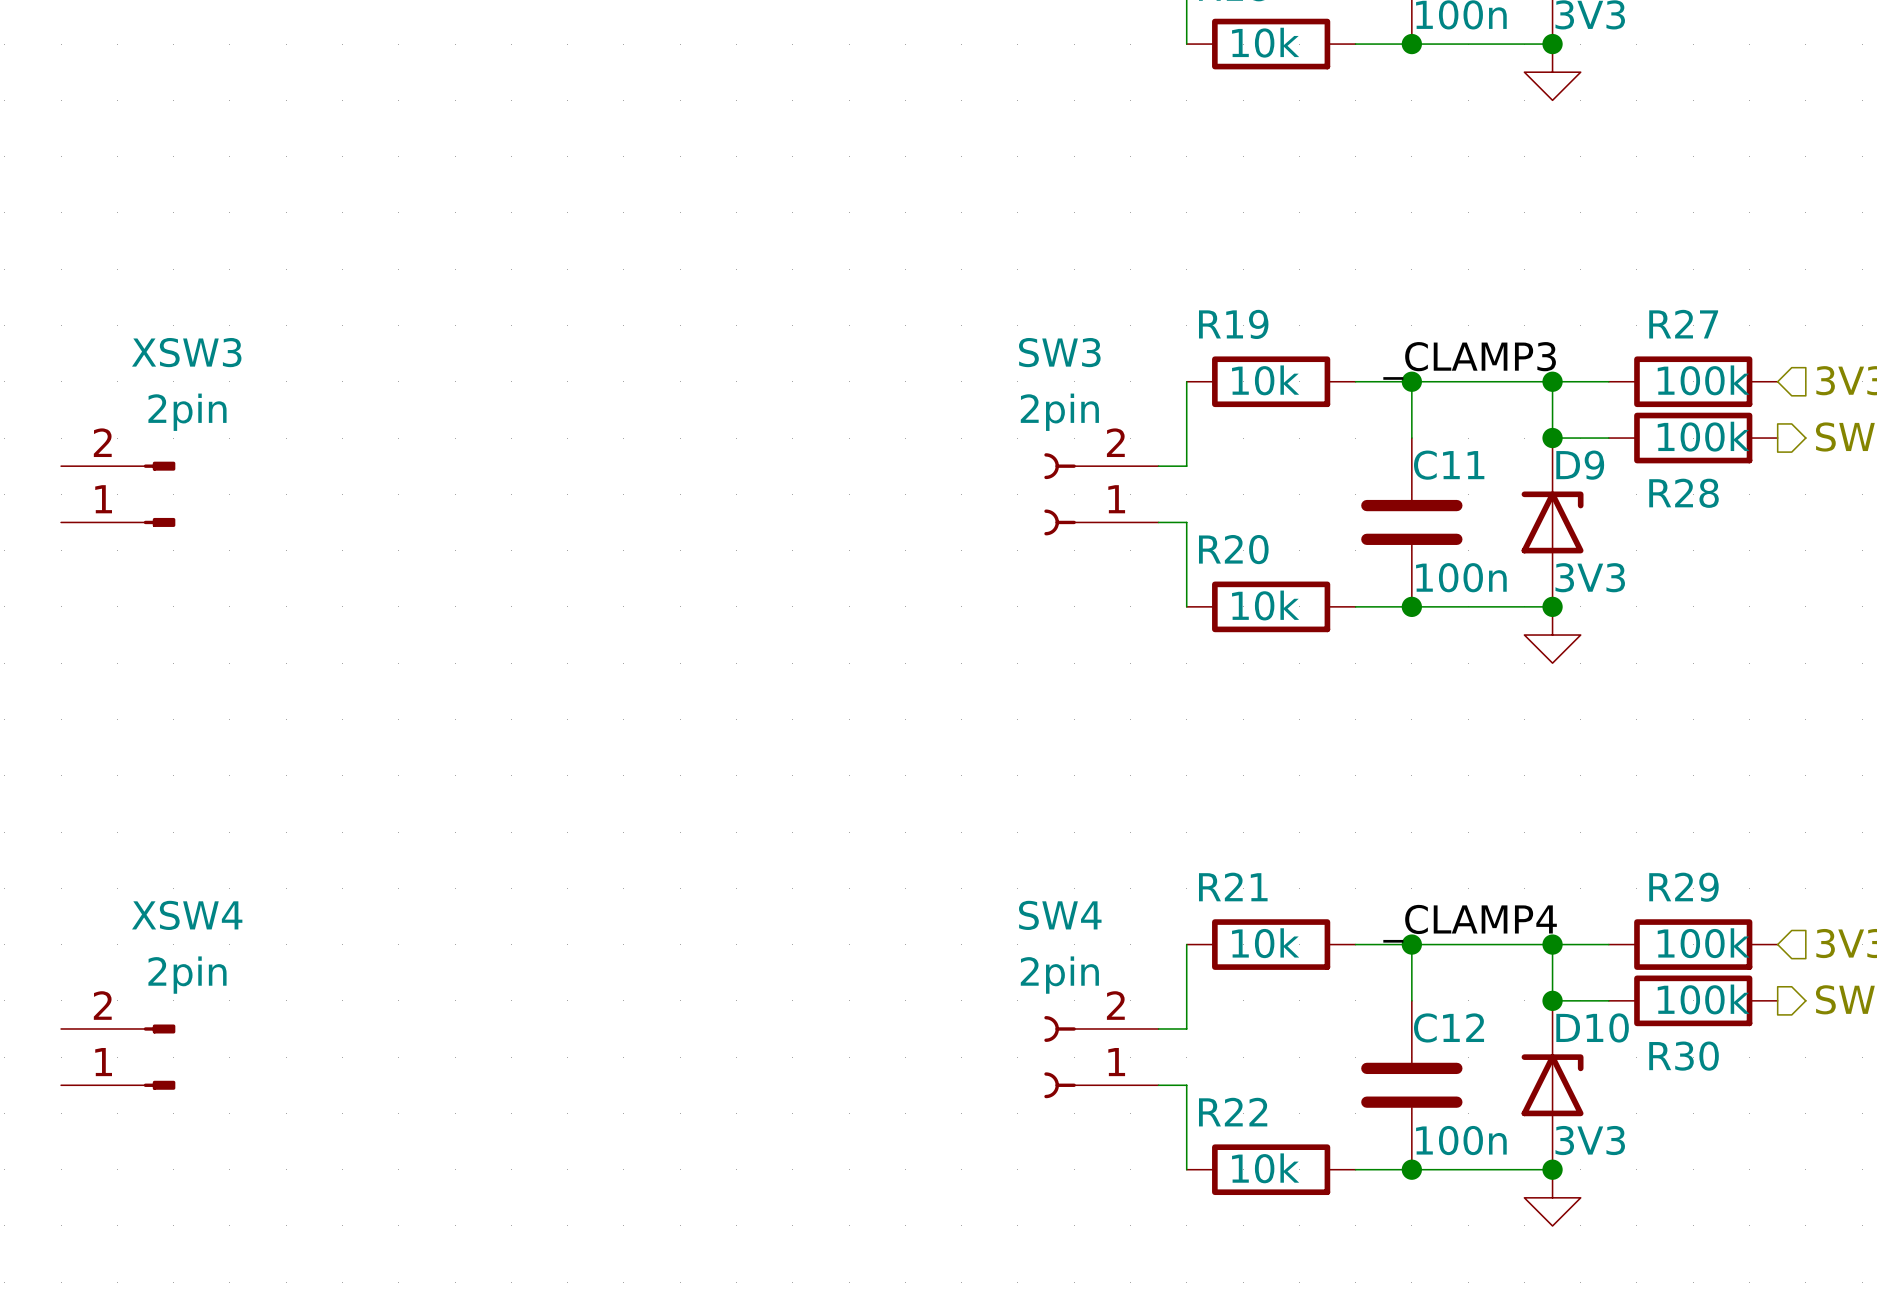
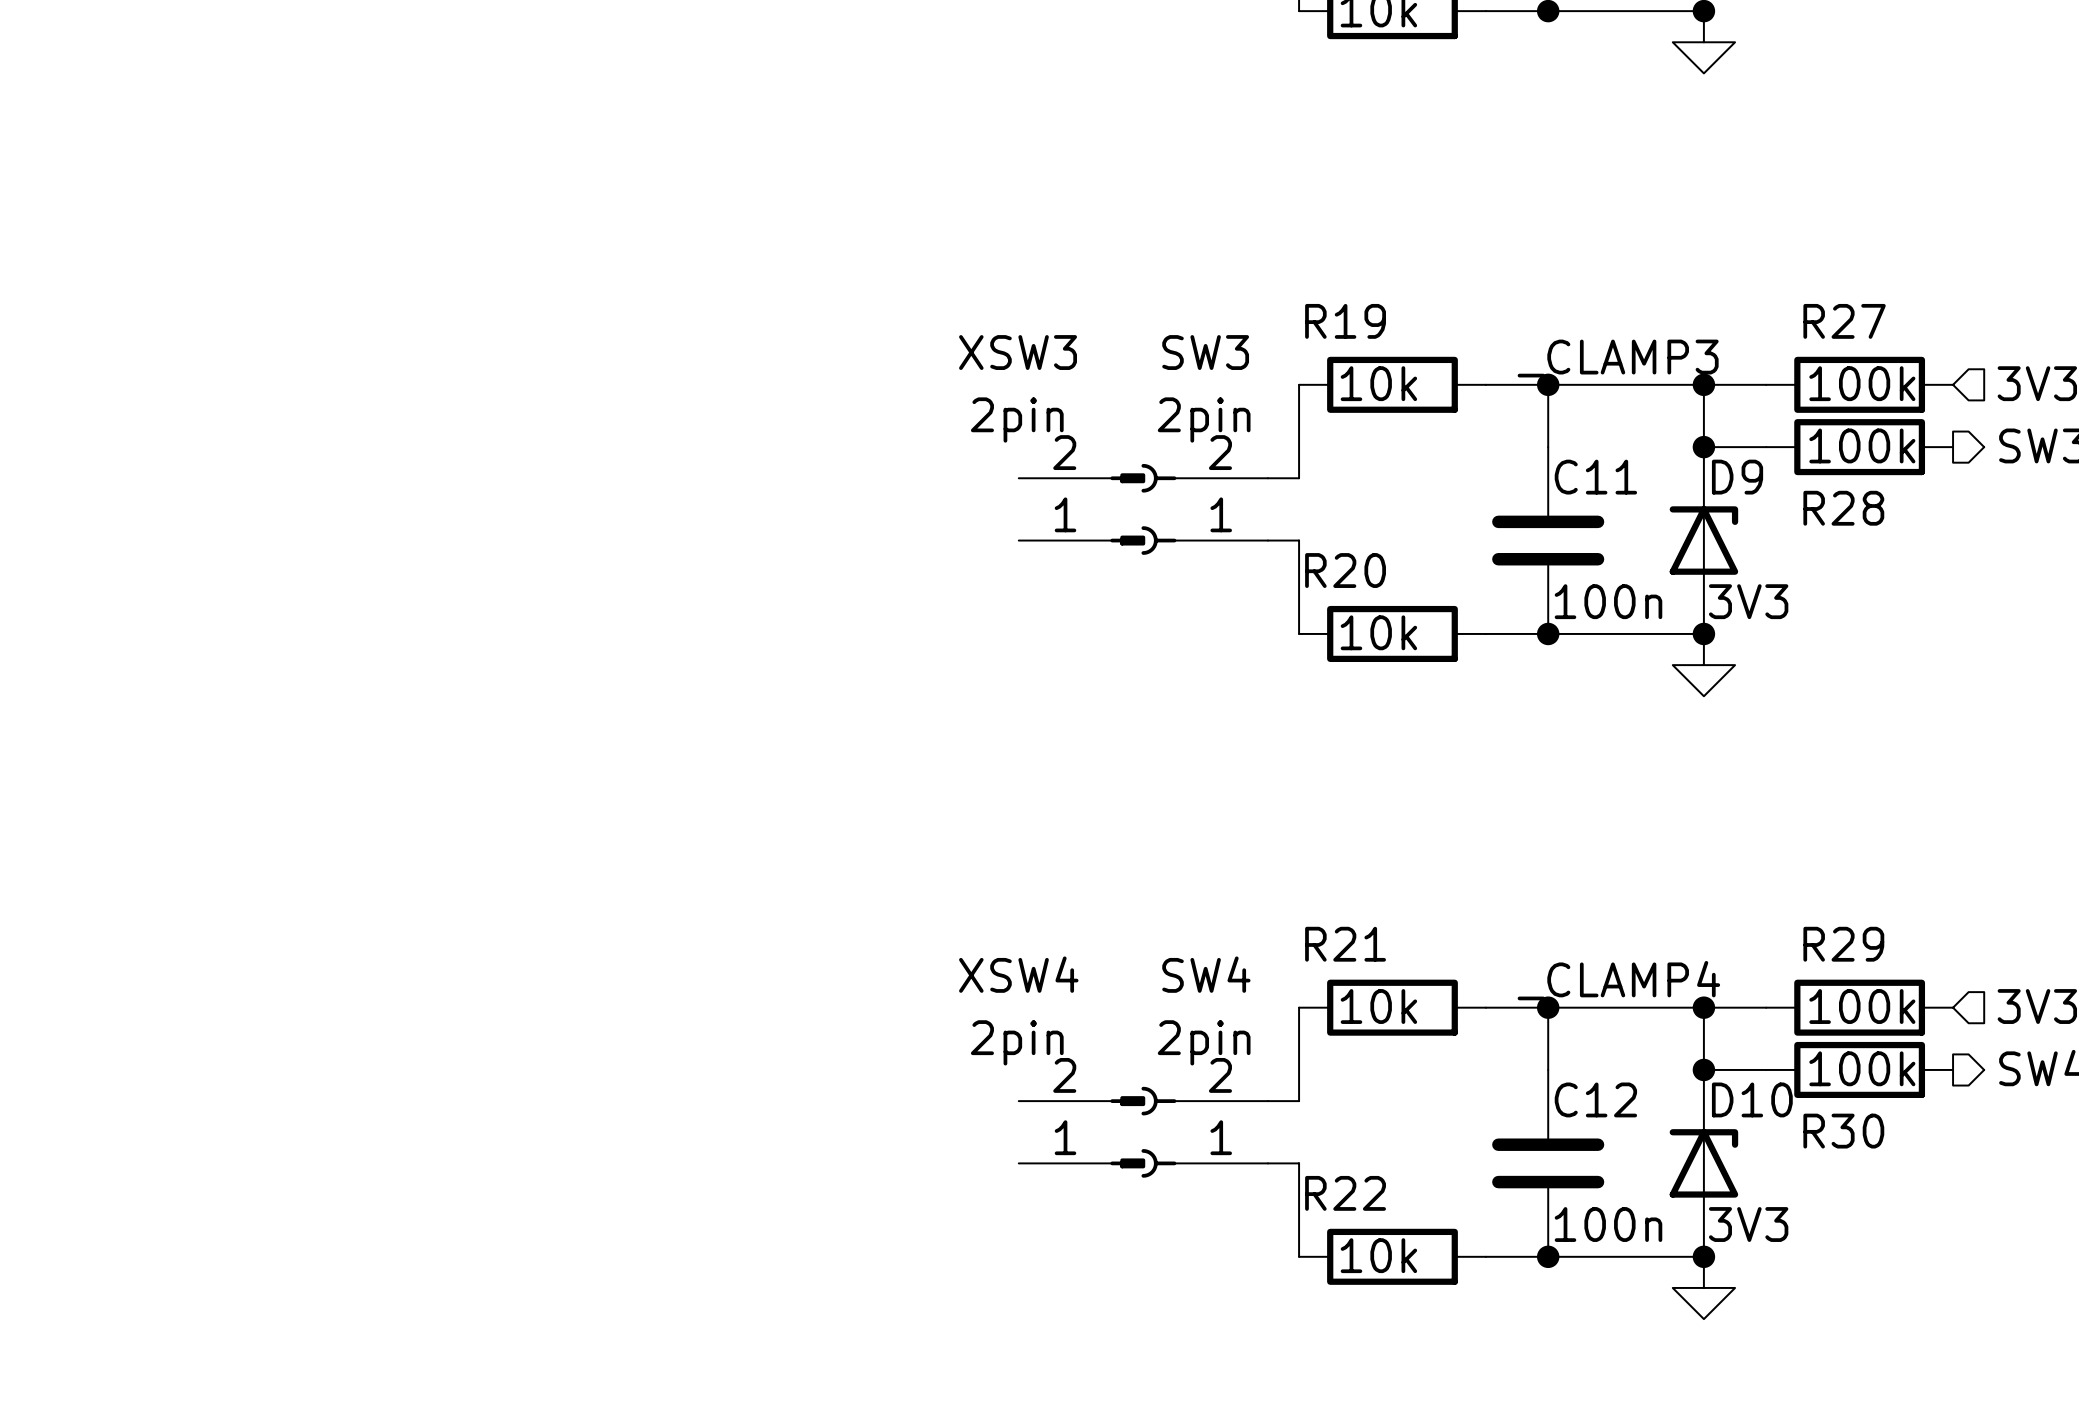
XSW3 name position: XSW3 (186, 352) -> XSW3 (1018, 352)
SW3 name position: SW3 (1059, 352) -> SW3 (1205, 352)
XSW3 value position: 2pin (187, 412) -> 2pin (1017, 420)
SW3 value position: 2pin (1059, 412) -> 2pin (1204, 420)
XSW3 position: (118, 494) -> (1082, 509)
XSW4 name position: XSW4 (187, 915) -> XSW4 (1018, 974)
SW4 name position: SW4 (1060, 915) -> SW4 (1206, 974)
XSW4 value position: 2pin (187, 975) -> 2pin (1017, 1042)
SW4 value position: 2pin (1059, 975) -> 2pin (1204, 1042)
XSW4 position: (118, 1057) -> (1082, 1132)

